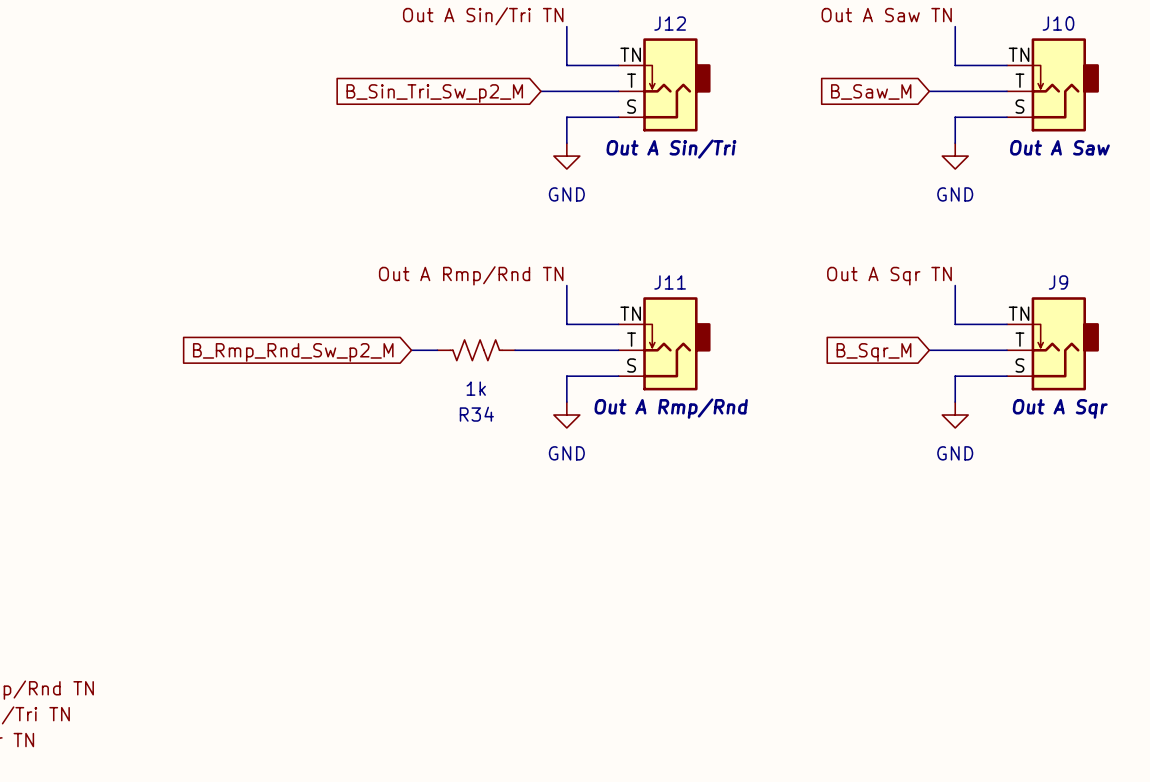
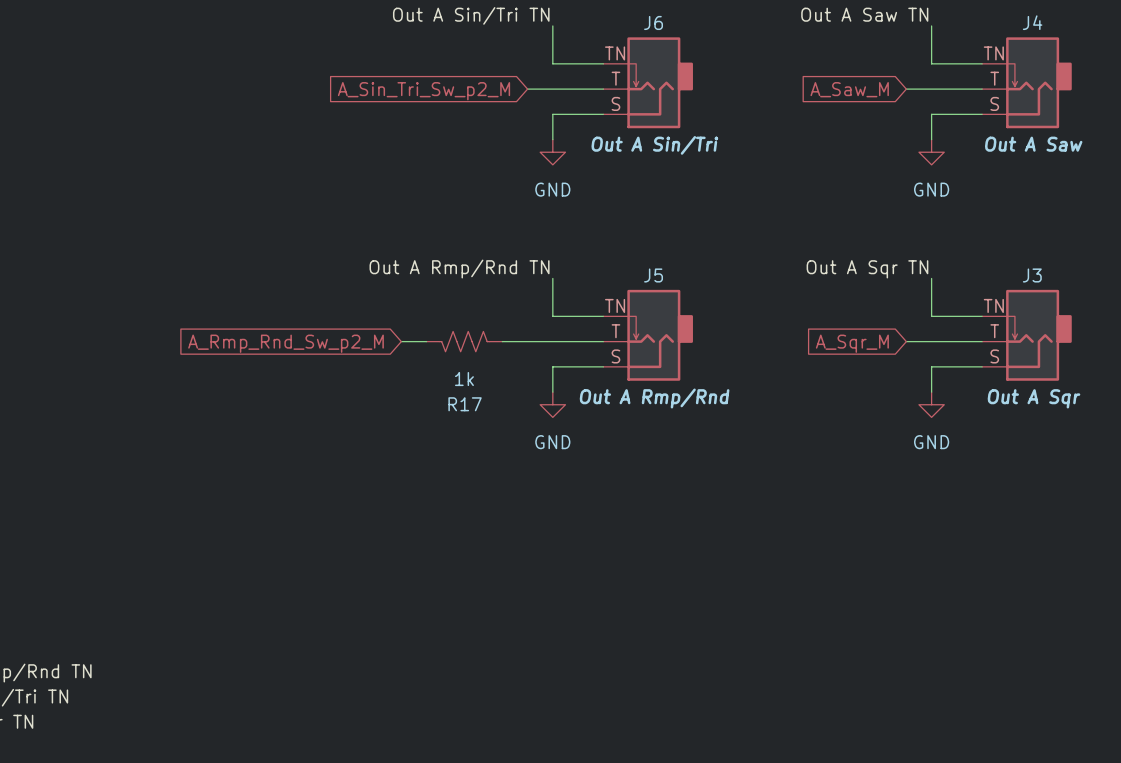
J12 name: J12 (670, 23) -> J6 (653, 22)
J10 name: J10 (1058, 23) -> J4 (1032, 22)
global label: B_Saw_M (871, 91) -> A_Saw_M (849, 89)
global label: B_Sin_Tri_Sw_p2_M (434, 93) -> A_Sin_Tri_Sw_p2_M (424, 91)
J11 name: J11 (670, 282) -> J5 (653, 275)
J9 name: J9 (1058, 282) -> J3 (1032, 275)
global label: B_Rmp_Rnd_Sw_p2_M (293, 352) -> A_Rmp_Rnd_Sw_p2_M (286, 343)
global label: B_Sqr_M (873, 352) -> A_Sqr_M (852, 343)
R34 name: R34 (476, 414) -> R17 (465, 404)

